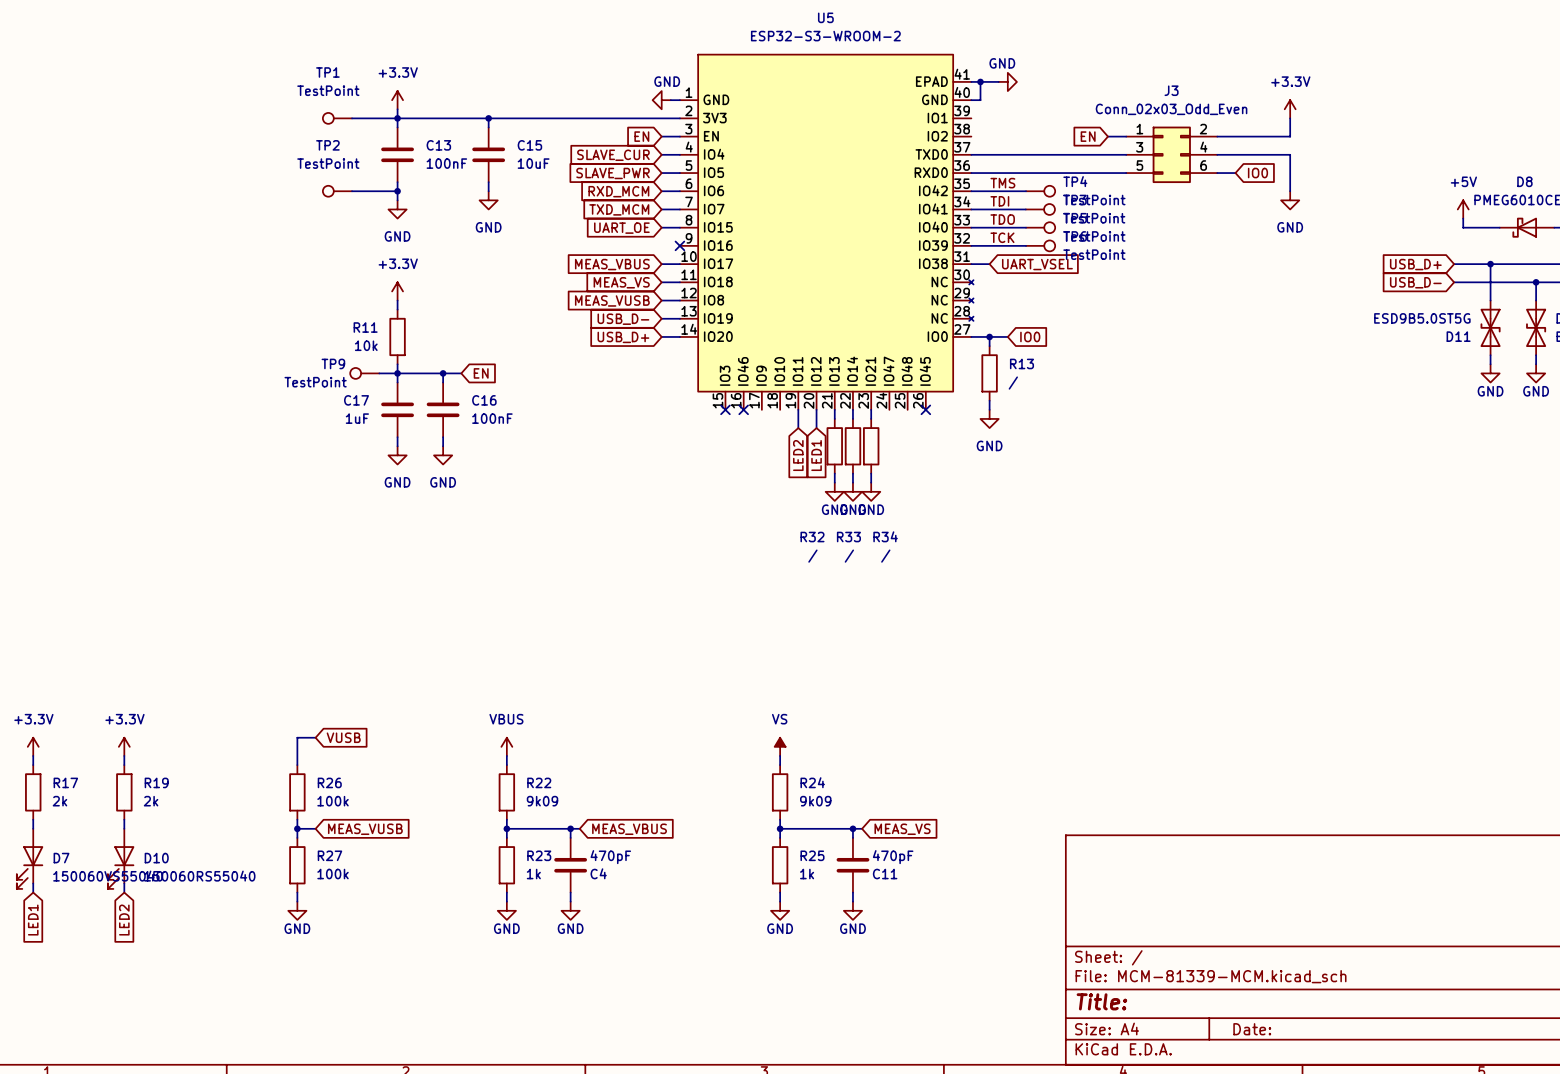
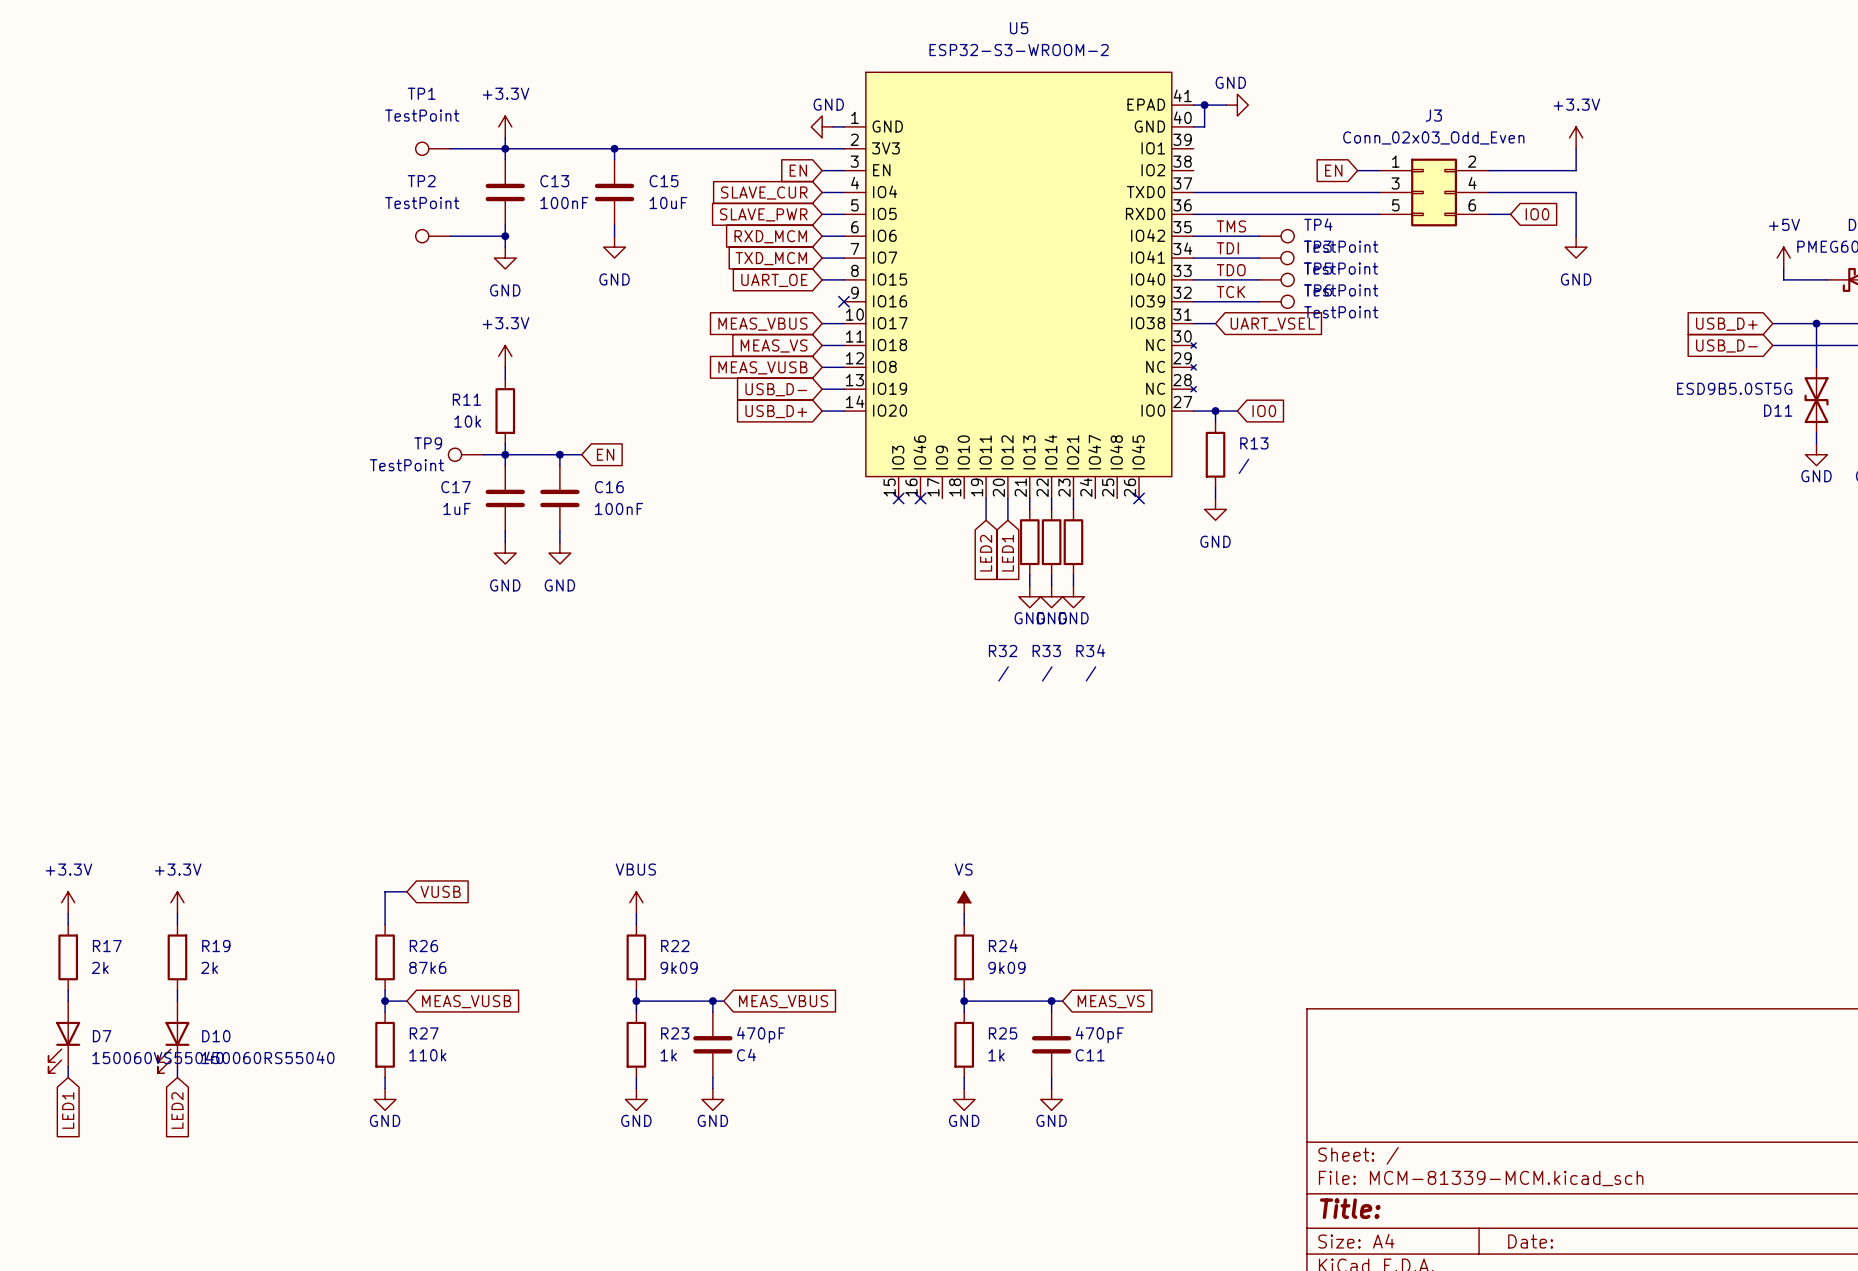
R26 value: 100k (333, 801) -> 87k6 (427, 967)
R27 value: 100k (333, 874) -> 110k (427, 1055)

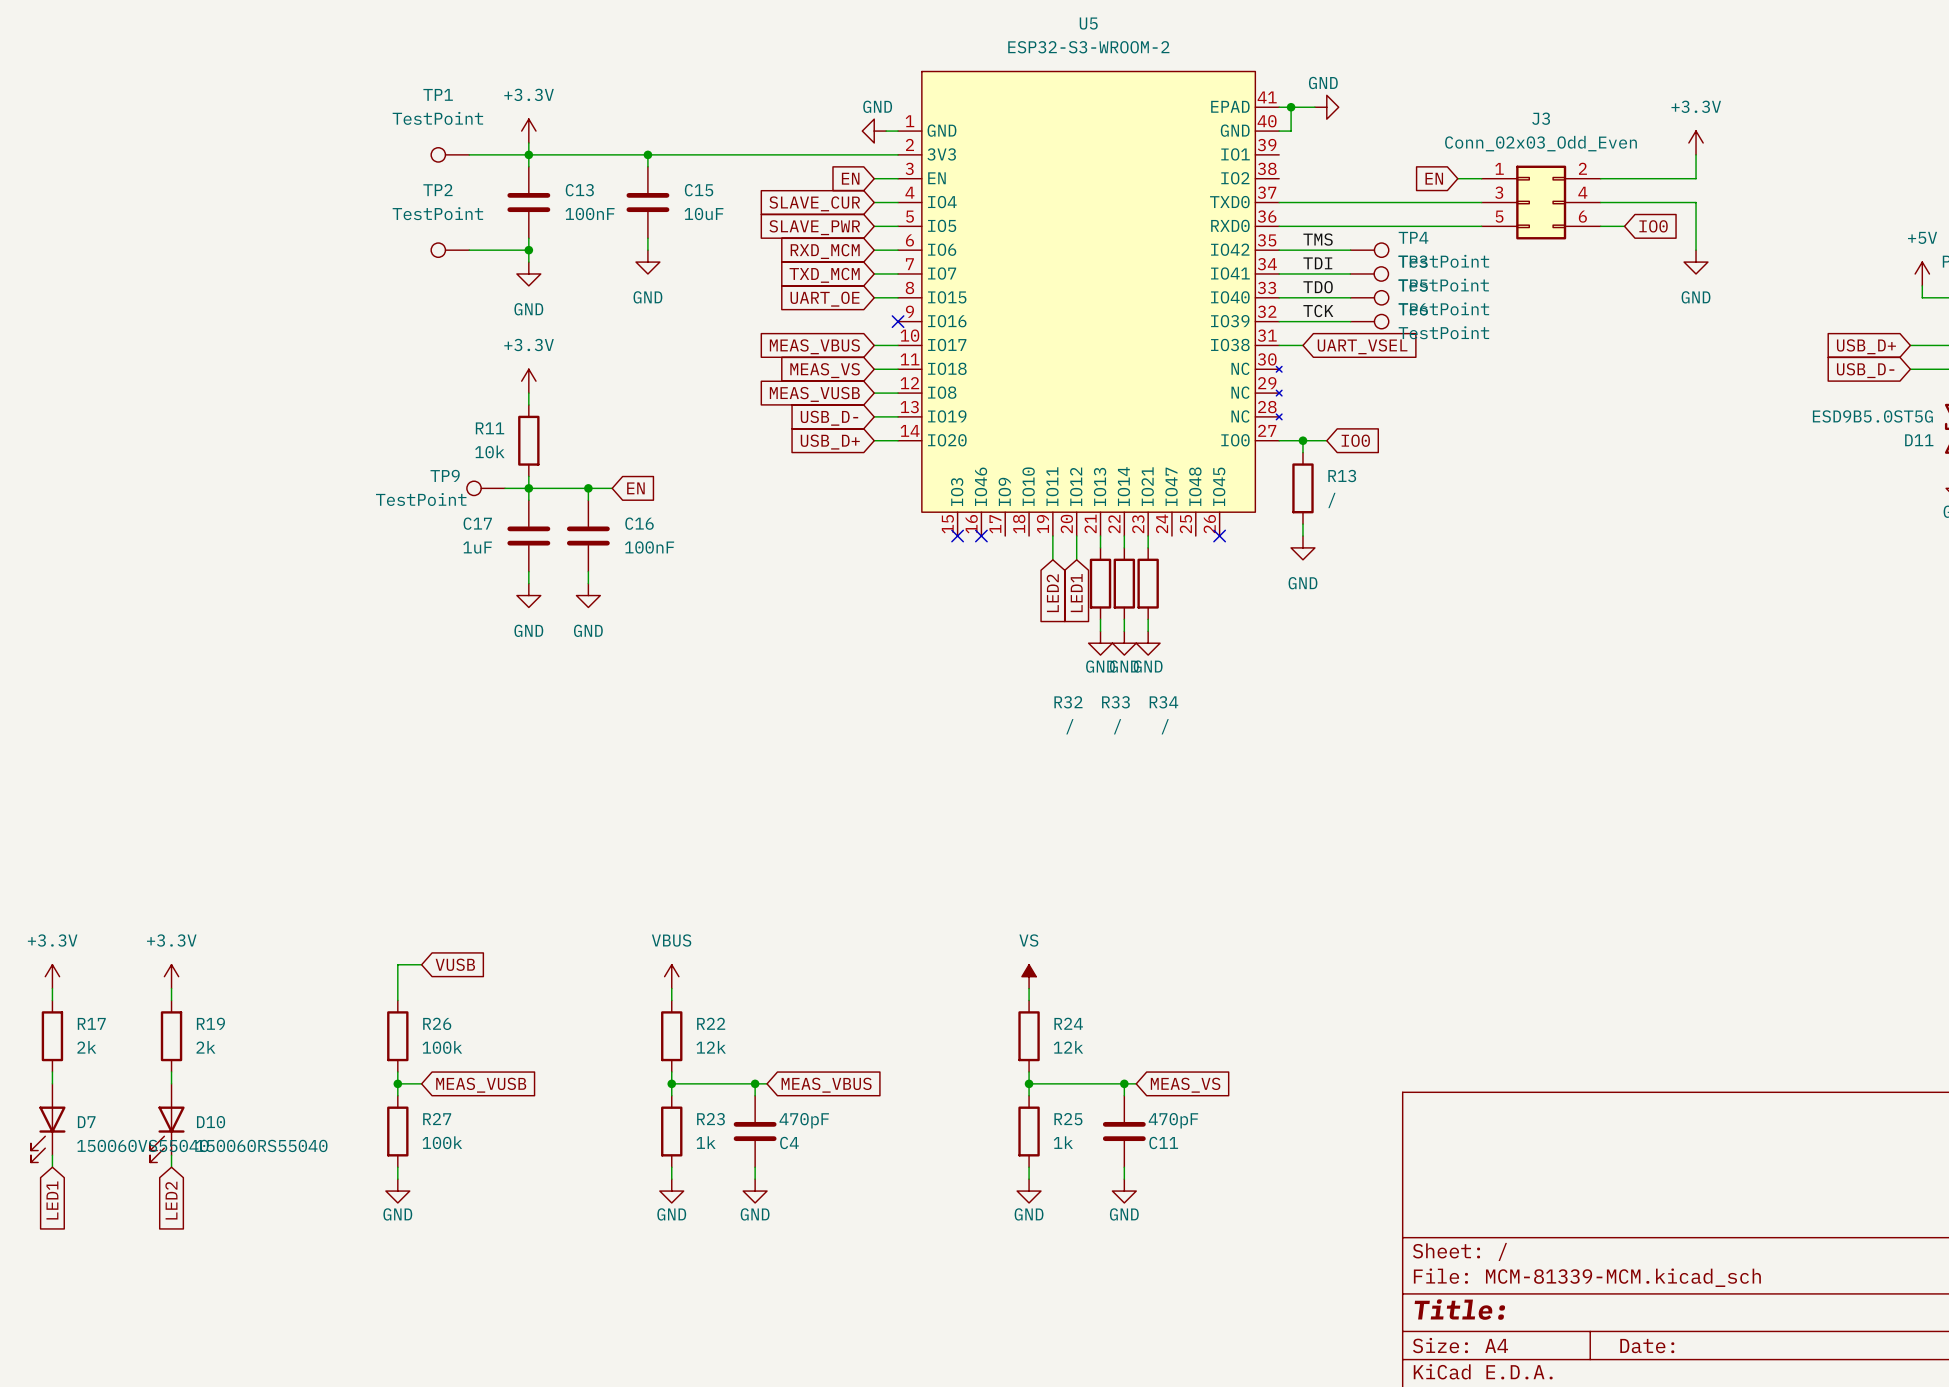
R26 value: 87k6 (427, 967) -> 100k (442, 1047)
R22 value: 9k09 (679, 967) -> 12k (711, 1047)
R24 value: 9k09 (1006, 967) -> 12k (1068, 1047)
R27 value: 110k (427, 1055) -> 100k (442, 1142)

